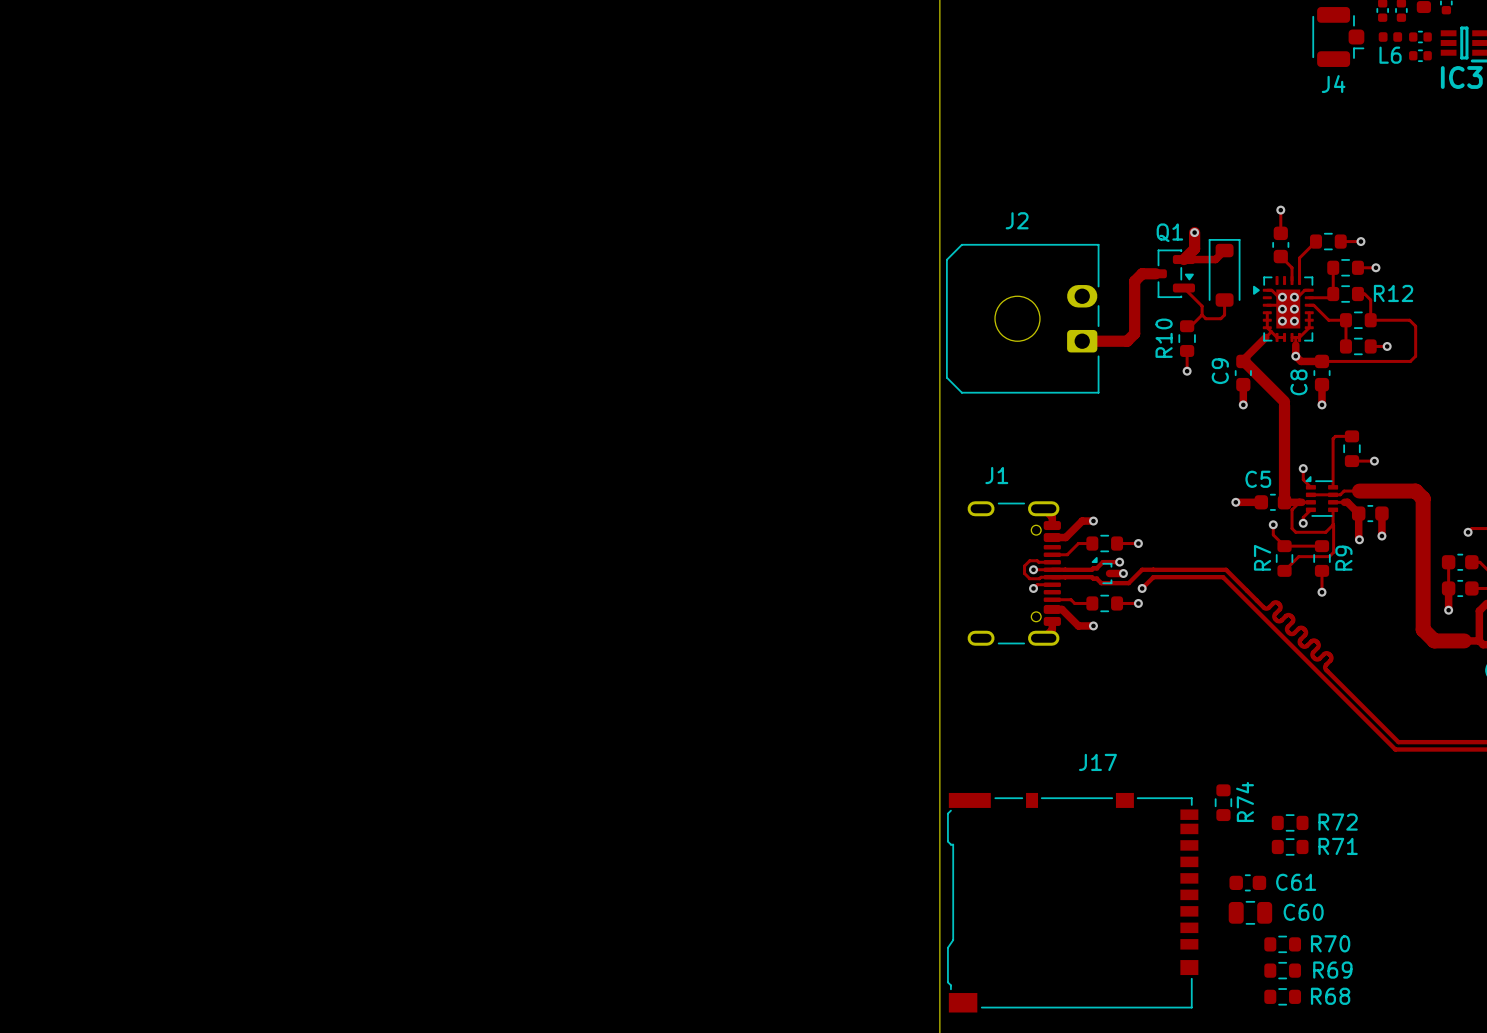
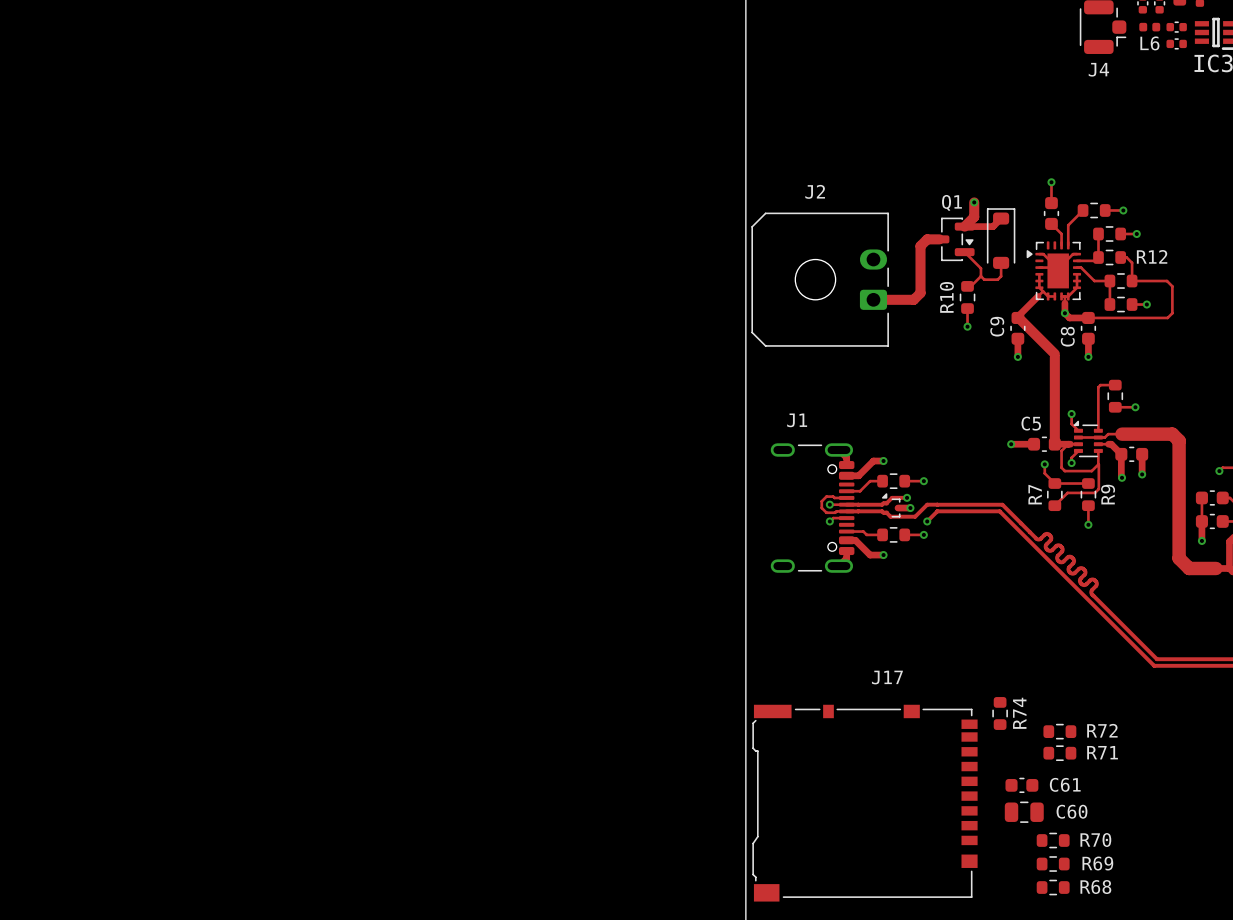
via: (1282, 297) -> none
via: (1294, 297) -> none
via: (1282, 309) -> none
via: (1294, 309) -> none
via: (1282, 321) -> none
via: (1294, 321) -> none

